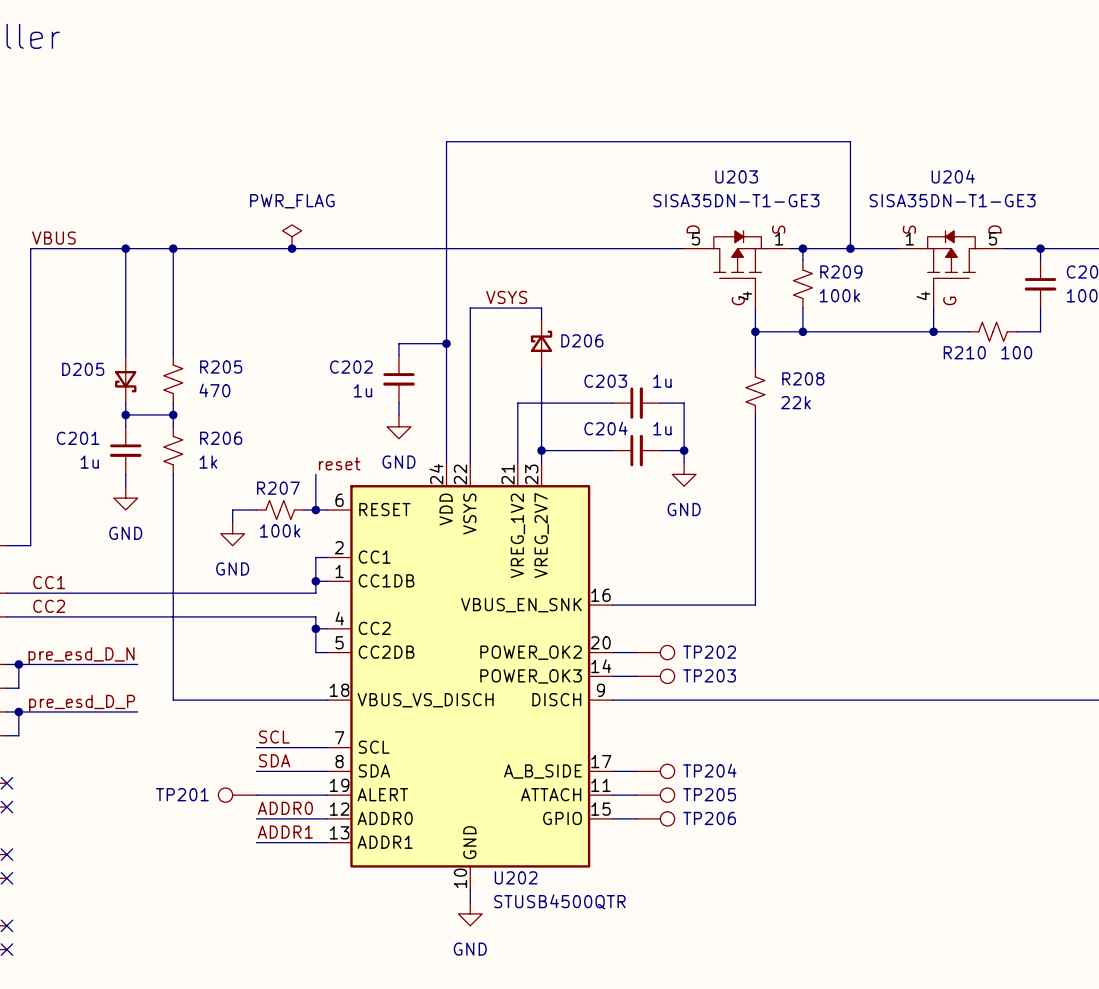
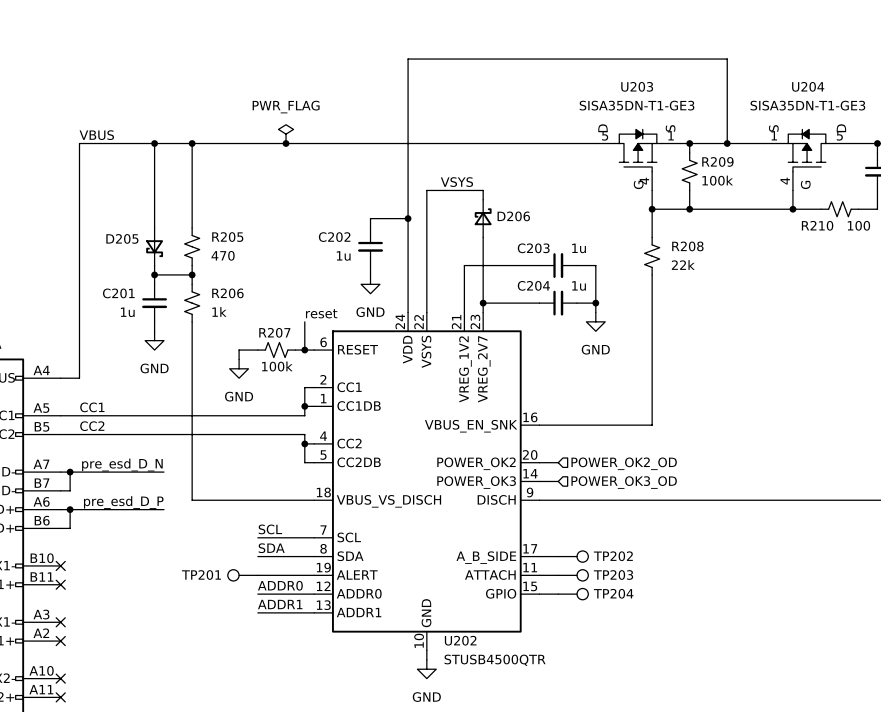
TP202: (655, 652) -> none
hierarchical label: none -> POWER_OK2_OD (624, 463)
TP203: (655, 676) -> none
hierarchical label: none -> POWER_OK3_OD (624, 482)
TP204 name: TP204 (709, 770) -> TP202 (613, 556)
TP205 name: TP205 (709, 794) -> TP203 (613, 575)
TP206 name: TP206 (709, 818) -> TP204 (613, 593)

